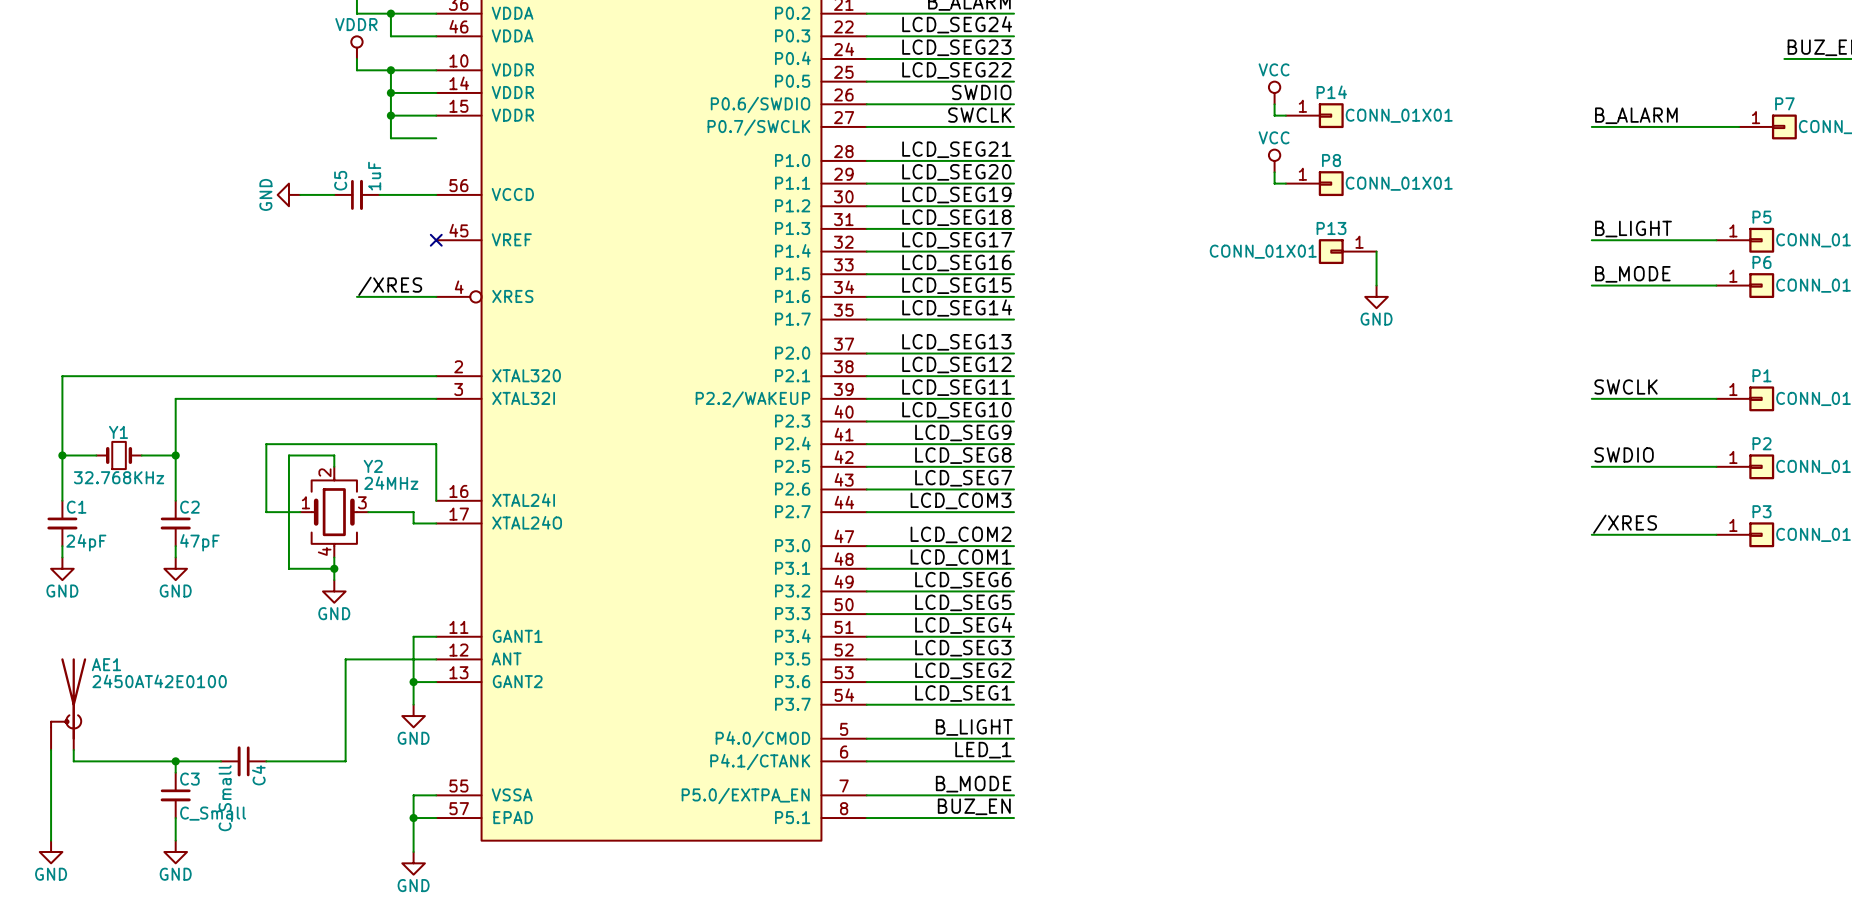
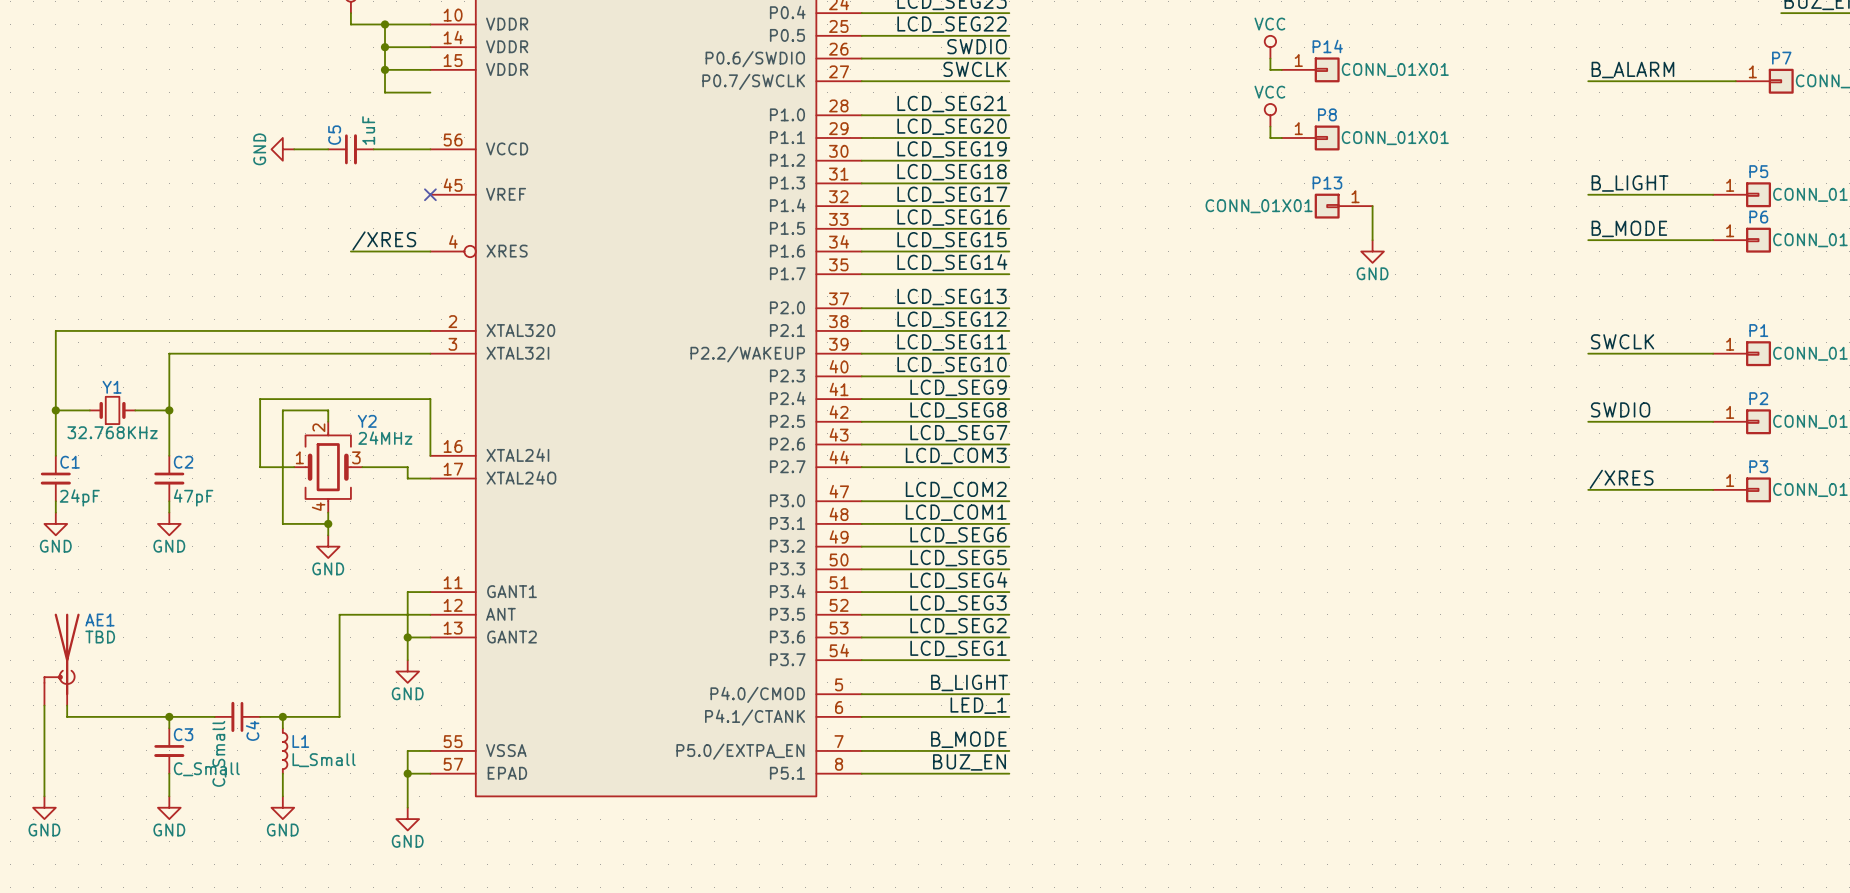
AE1 value: 2450AT42E0100 (159, 681) -> TBD (100, 637)
wire: none -> (282, 716) (282, 728)
junction: none -> (282, 716)
L1: none -> L_Small (285, 750)
wire: none -> (282, 773) (282, 796)
power symbol: none -> GND (282, 807)

